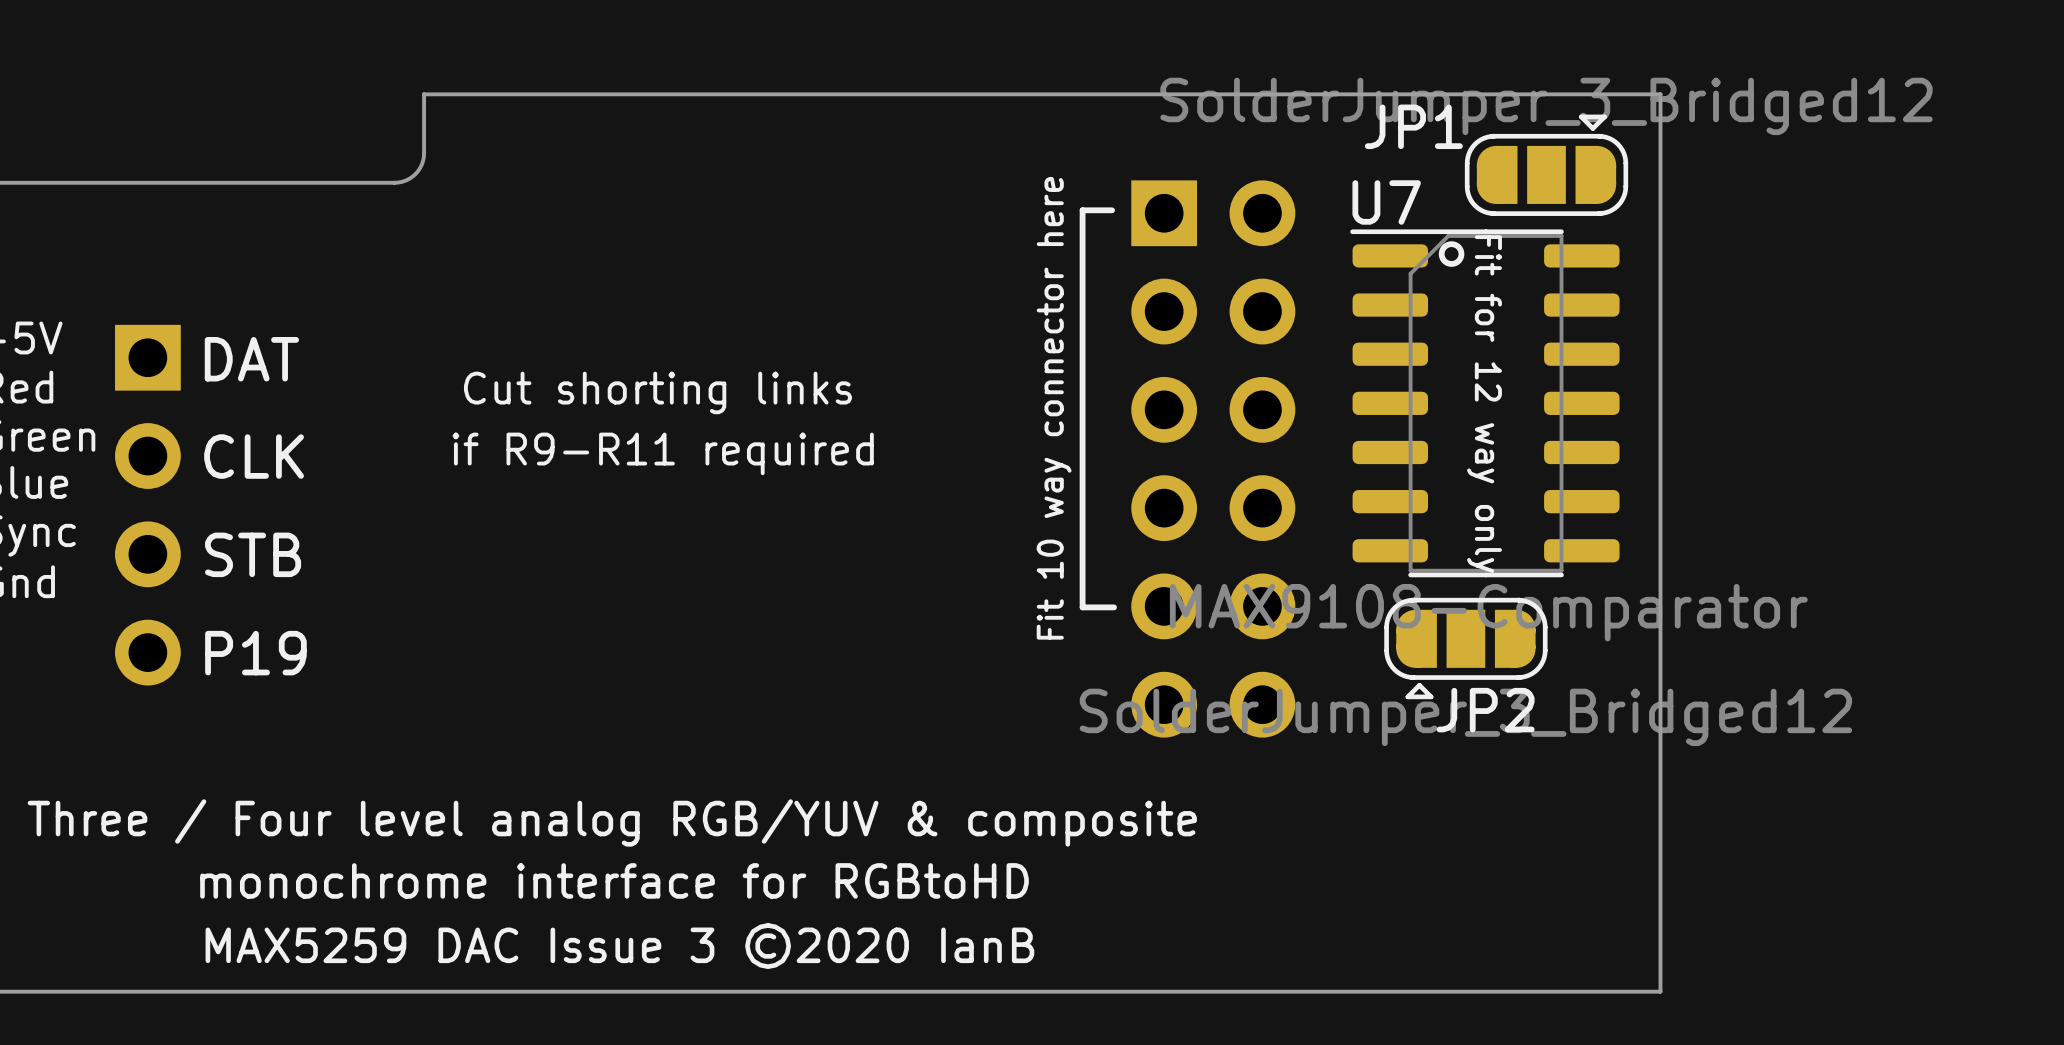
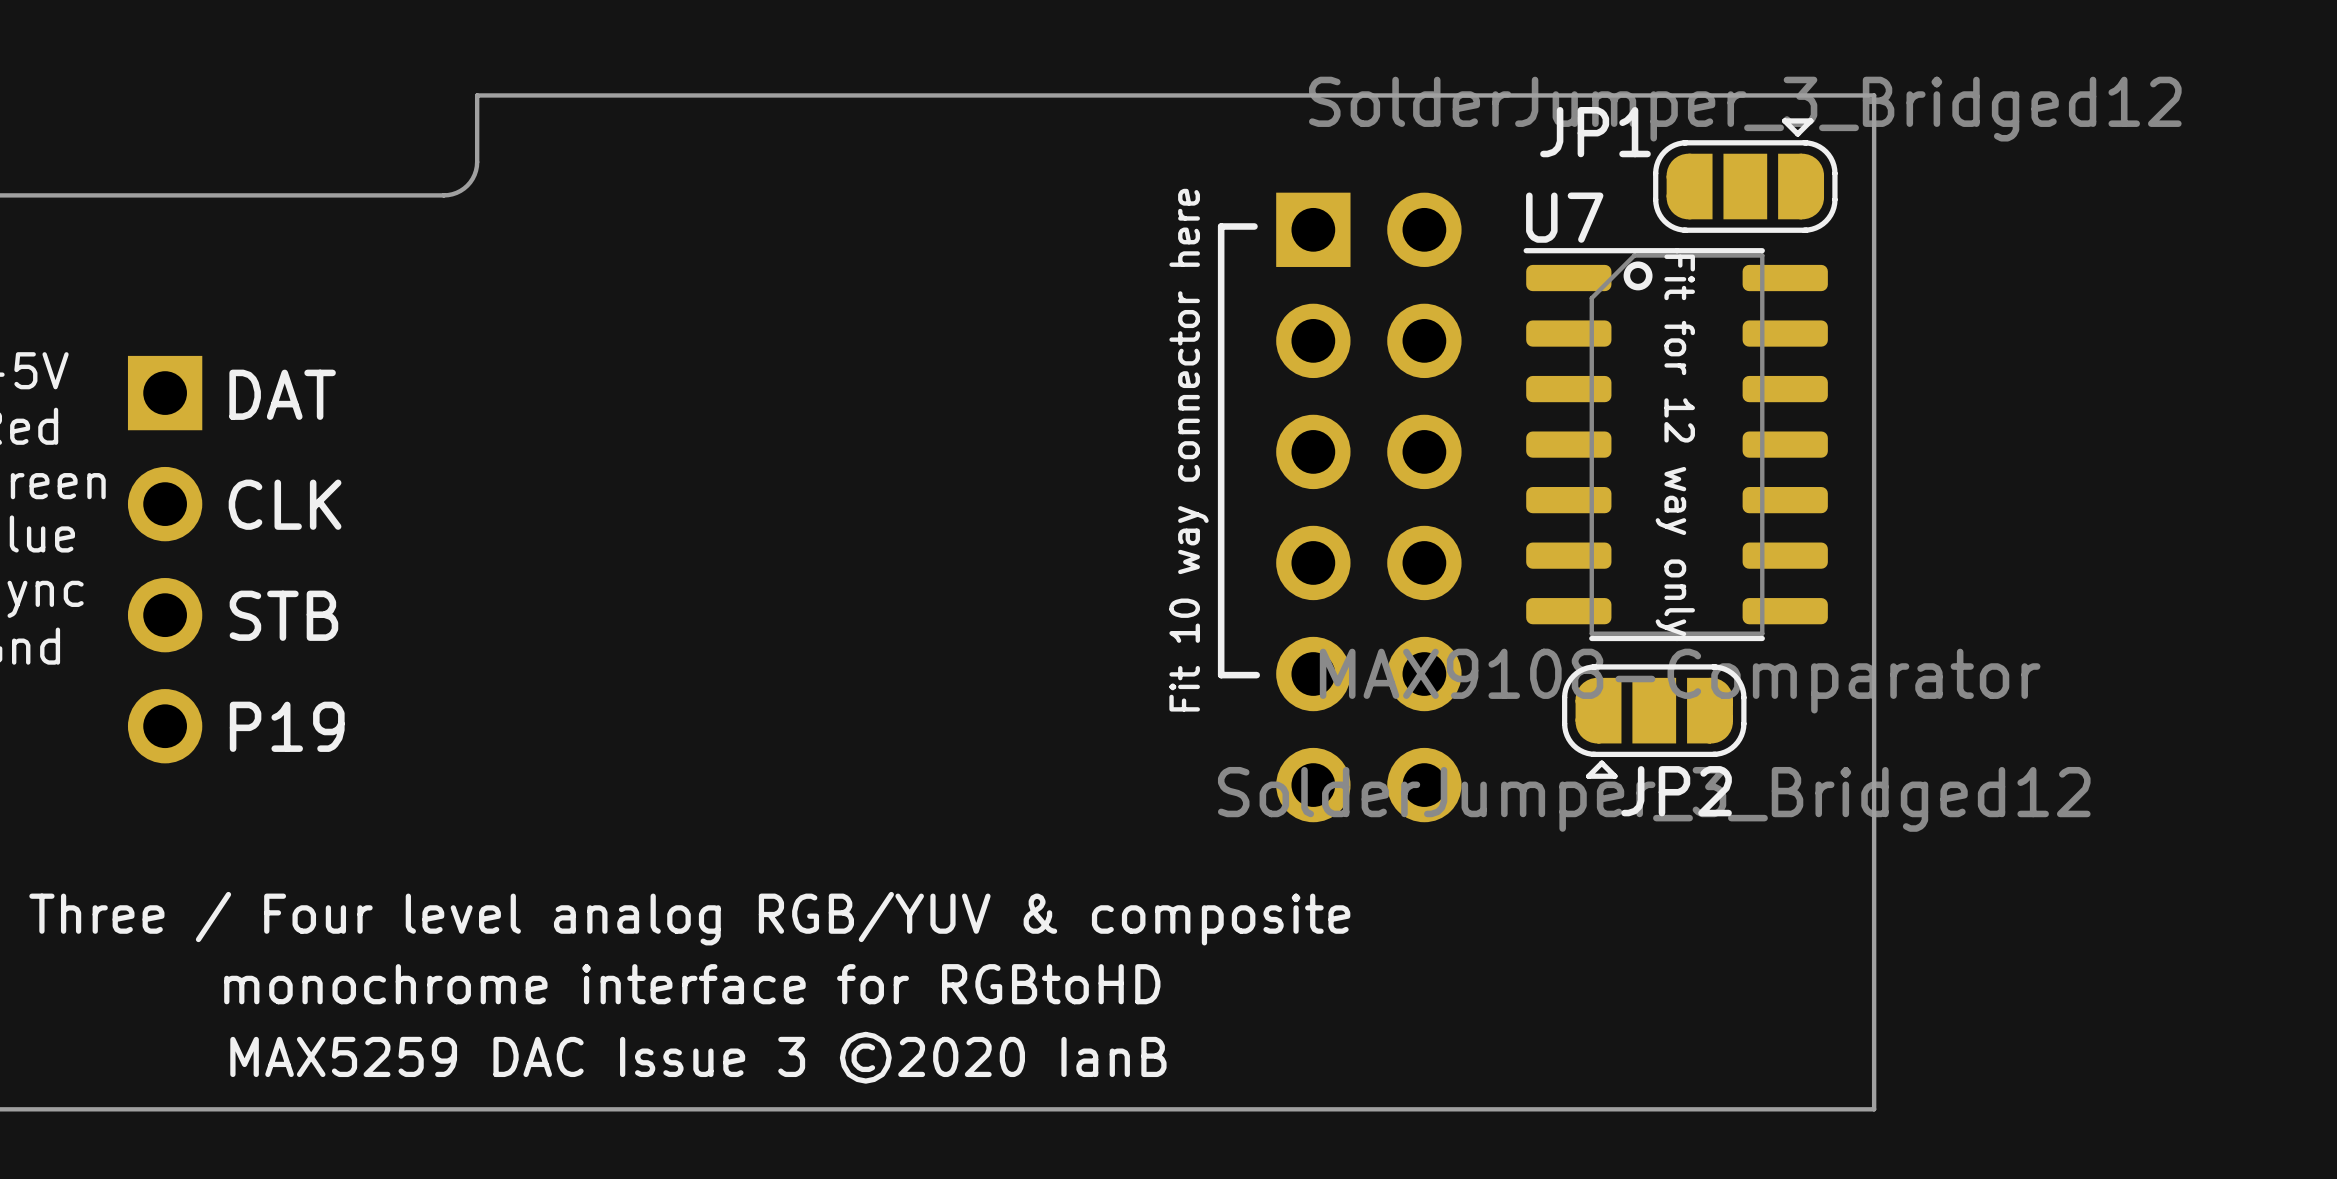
text: Cut shorting links (658, 392) -> none
text: if R9-R11 required (663, 453) -> none

